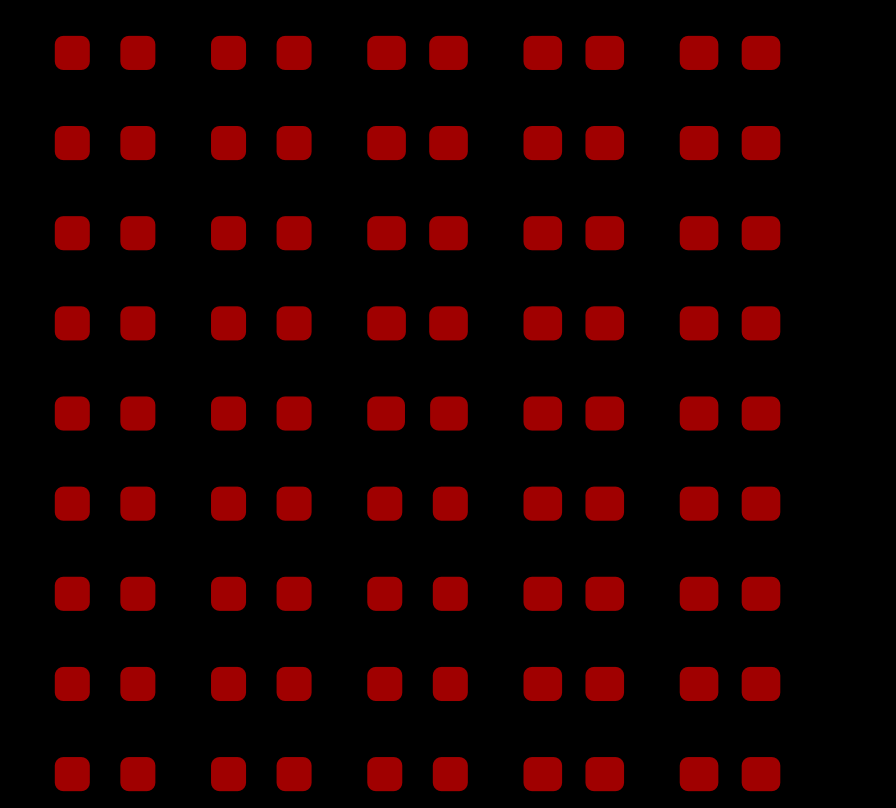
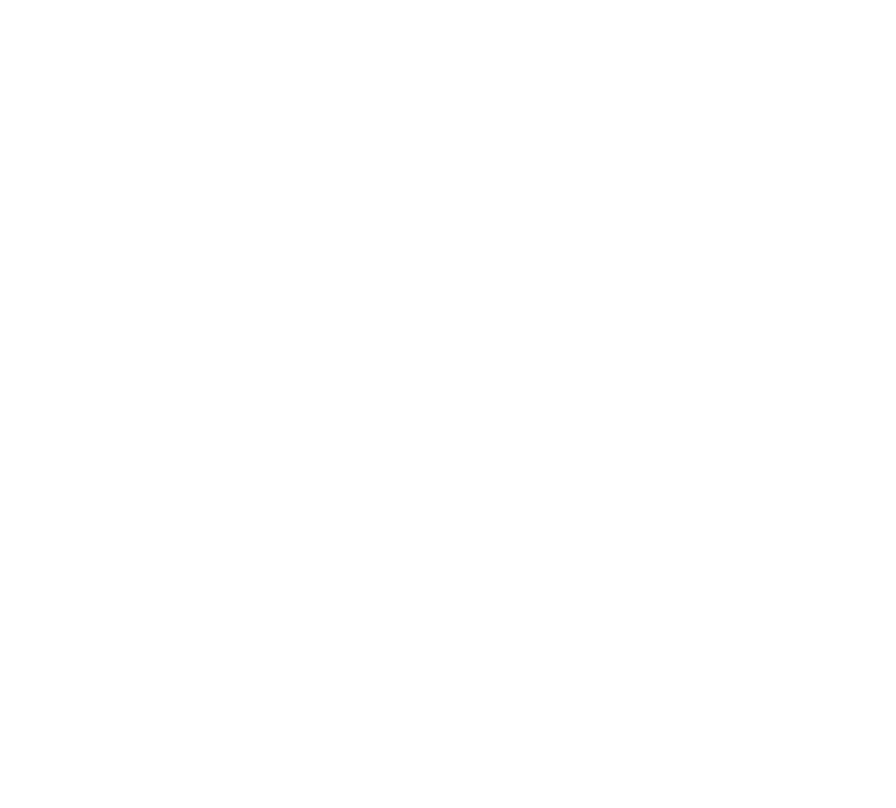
part: (105, 52) -> none
part: (261, 52) -> none
part: (417, 52) -> none
part: (573, 52) -> none
part: (730, 52) -> none
part: (105, 143) -> none
part: (261, 143) -> none
part: (417, 143) -> none
part: (573, 143) -> none
part: (730, 143) -> none
part: (105, 233) -> none
part: (261, 233) -> none
part: (417, 233) -> none
part: (573, 233) -> none
part: (730, 233) -> none
part: (105, 323) -> none
part: (261, 323) -> none
part: (417, 323) -> none
part: (573, 323) -> none
part: (730, 323) -> none
part: (105, 413) -> none
part: (261, 413) -> none
part: (417, 413) -> none
part: (573, 413) -> none
part: (730, 413) -> none
part: (105, 503) -> none
part: (261, 503) -> none
part: (417, 503) -> none
part: (573, 503) -> none
part: (730, 503) -> none
part: (105, 593) -> none
part: (261, 593) -> none
part: (417, 593) -> none
part: (573, 593) -> none
part: (730, 593) -> none
part: (105, 683) -> none
part: (261, 683) -> none
part: (417, 683) -> none
part: (573, 683) -> none
part: (730, 683) -> none
part: (105, 774) -> none
part: (261, 774) -> none
part: (417, 774) -> none
part: (573, 774) -> none
part: (730, 774) -> none

